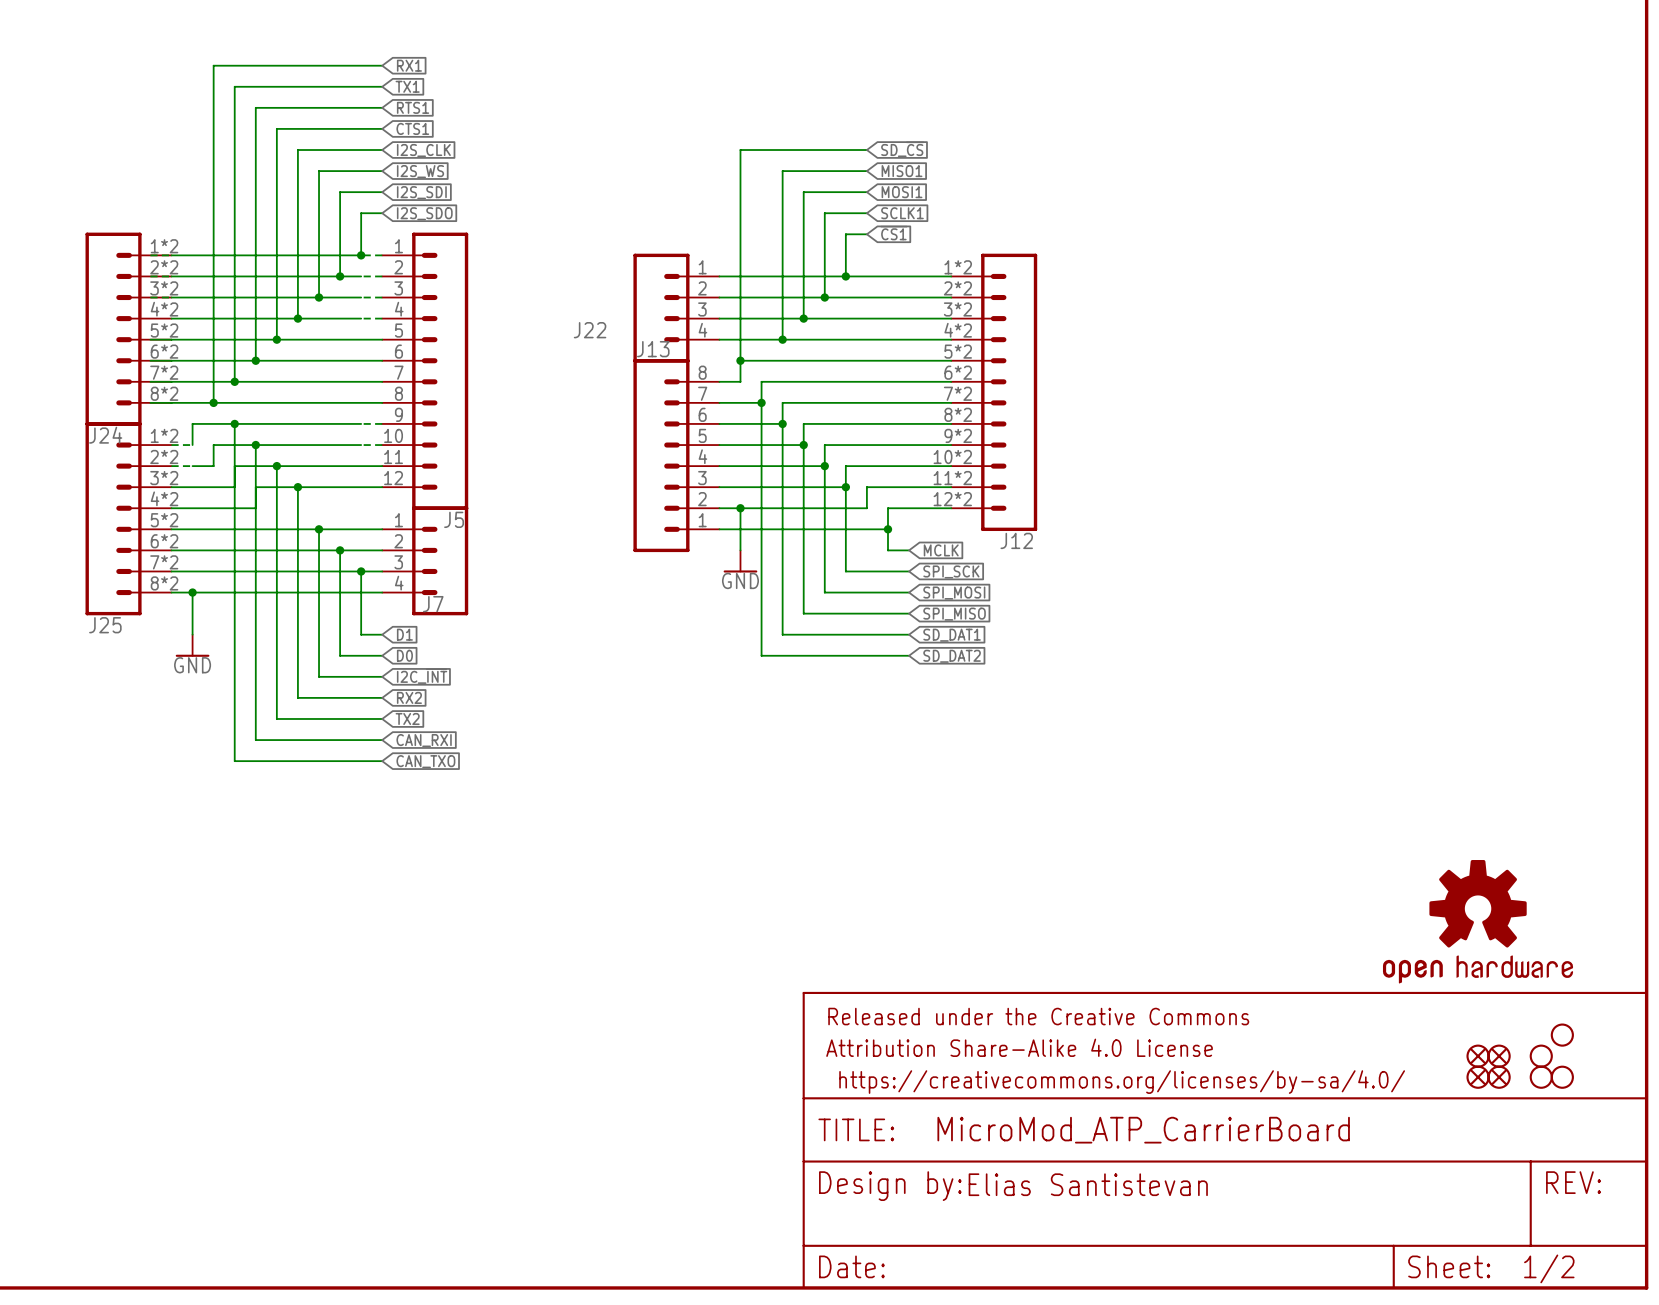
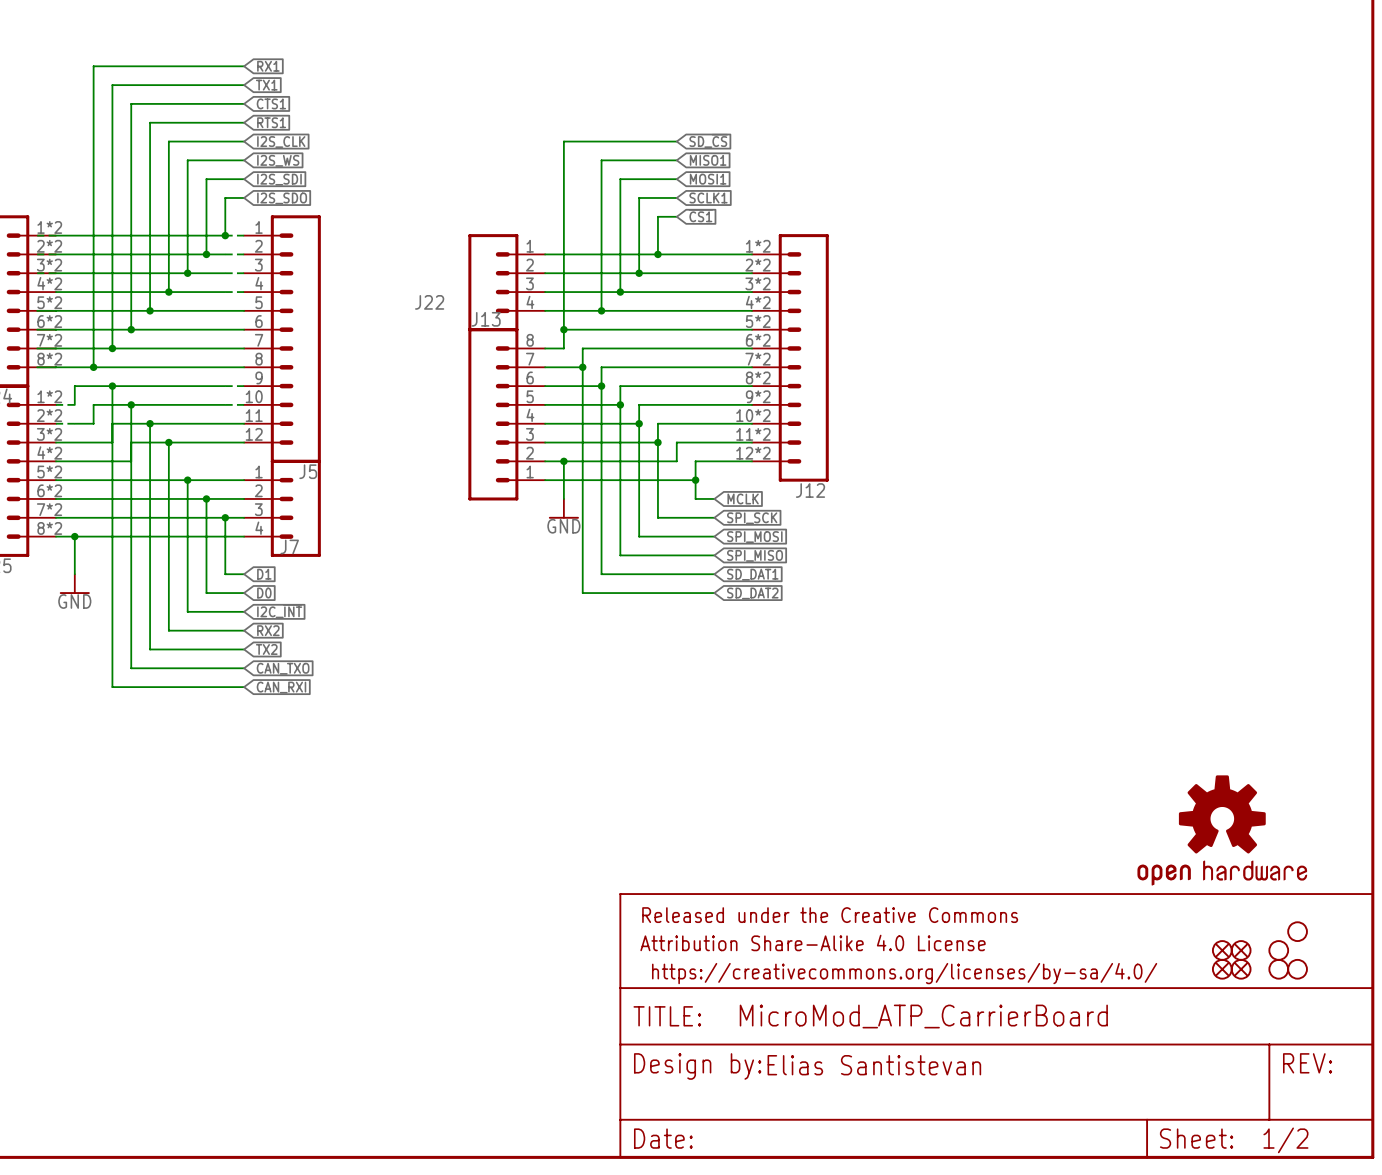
global label: RTS1 (413, 107) -> CTS1 (271, 103)
global label: CTS1 (412, 128) -> RTS1 (271, 122)
global label: CAN_RXI (424, 740) -> CAN_TXO (283, 668)
global label: CAN_TXO (425, 761) -> CAN_RXI (281, 687)

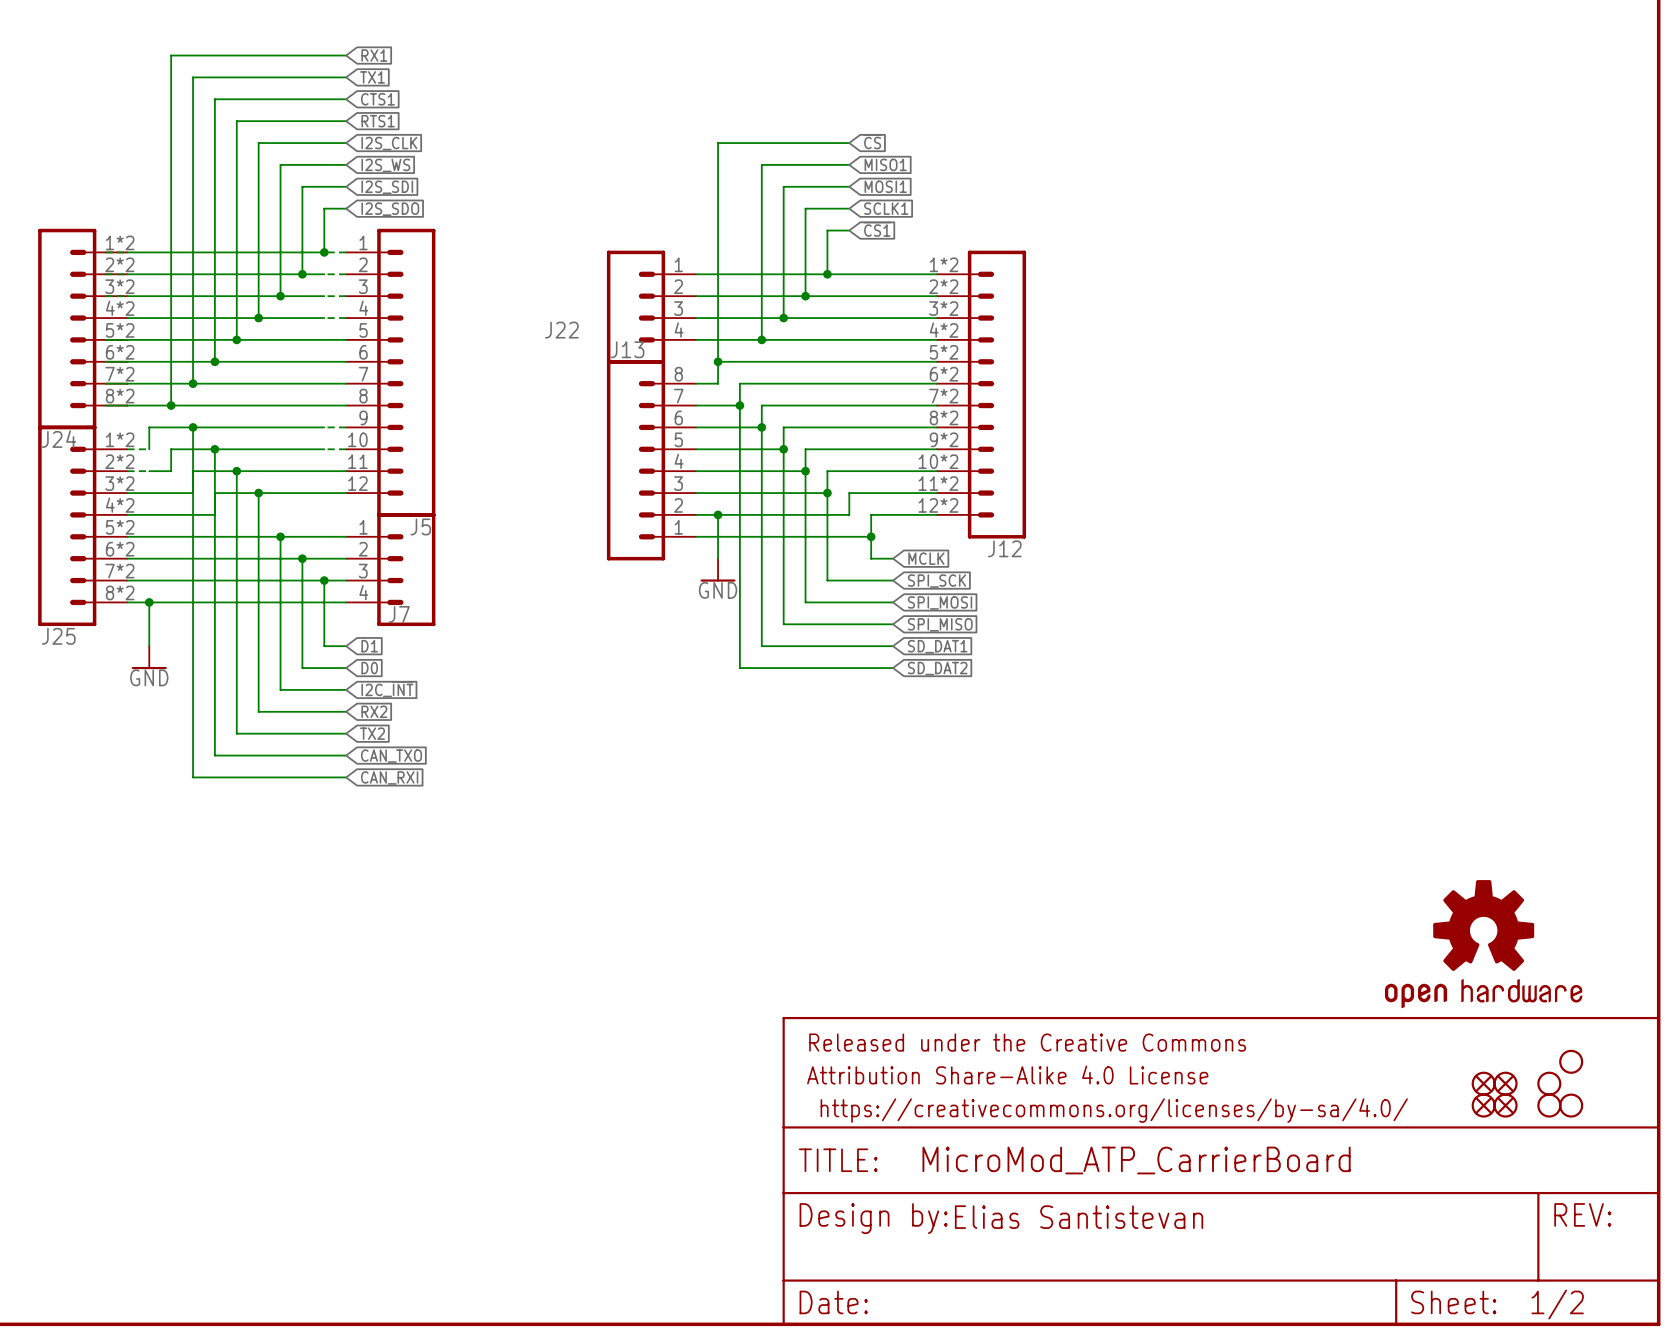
global label: SD_~{CS} (708, 140) -> ~{CS} (872, 141)

